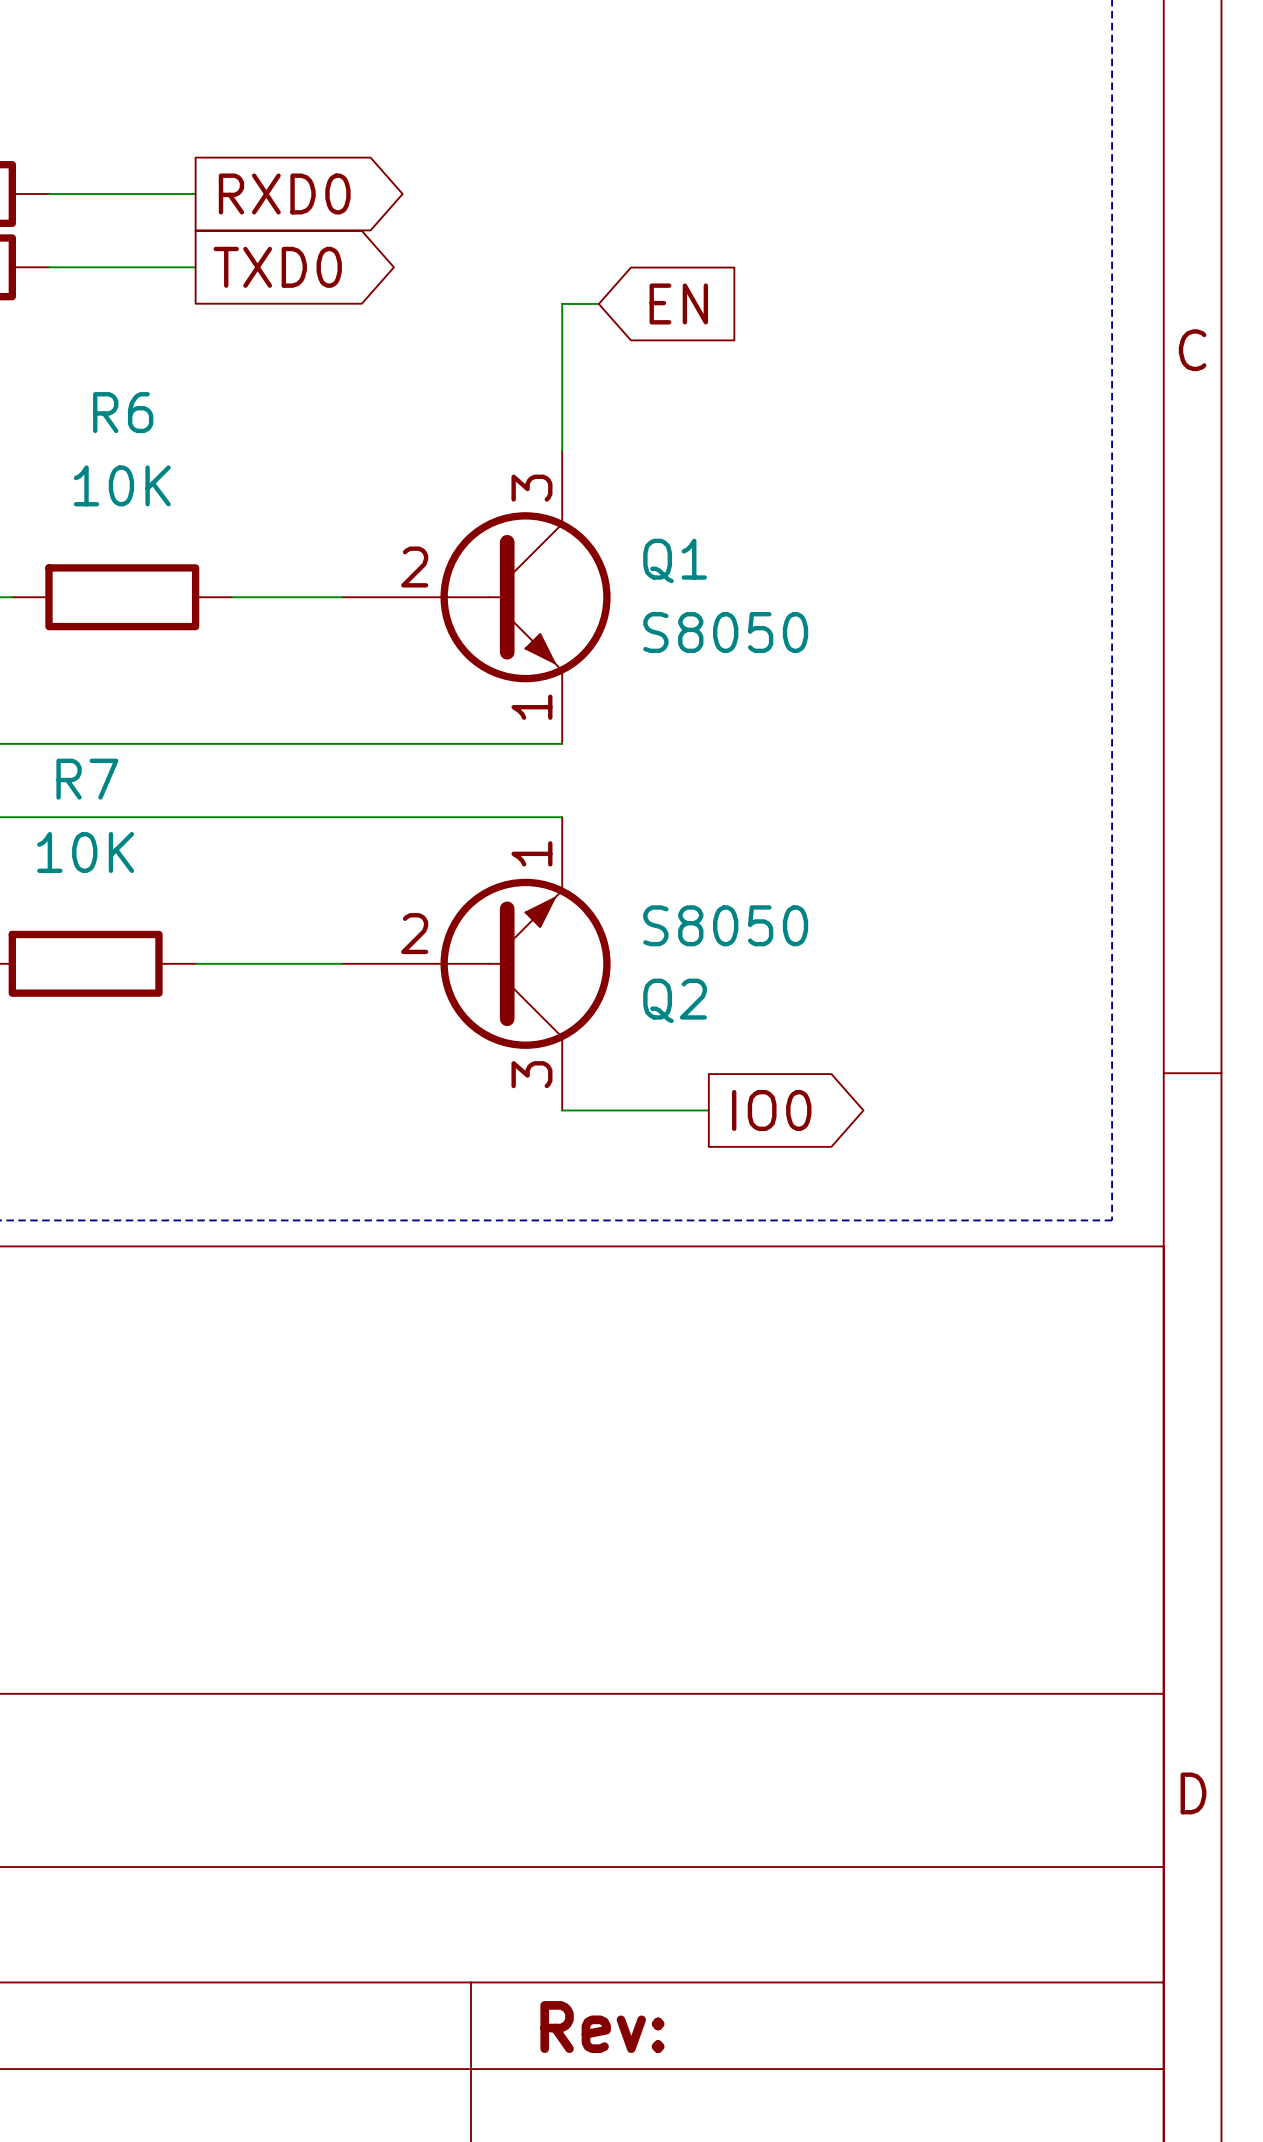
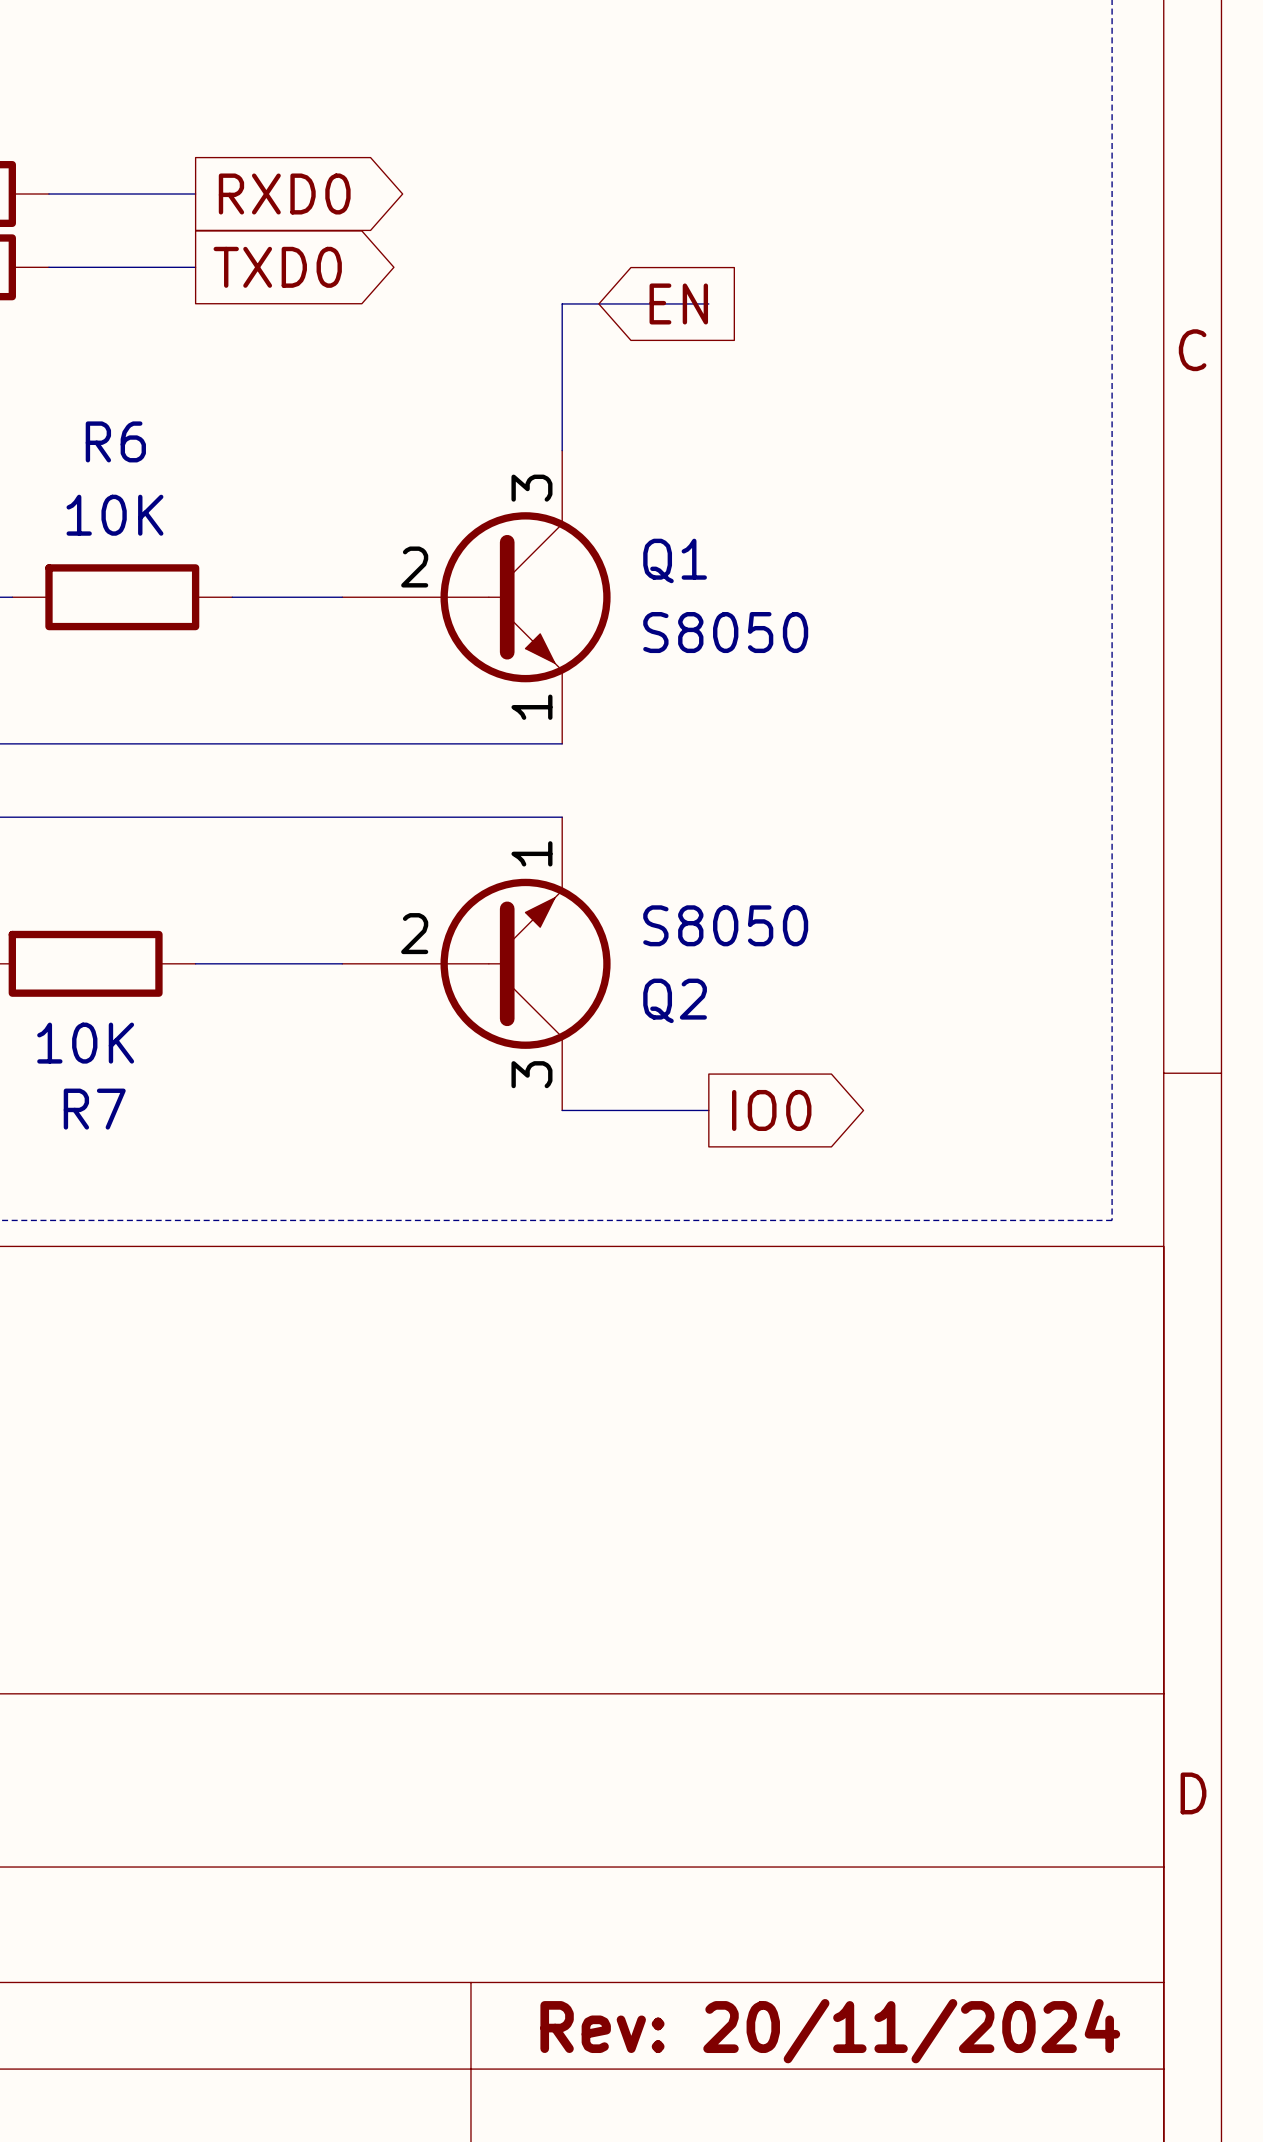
wire: none -> (598, 303) (708, 303)
R6 name position: R6 (123, 412) -> R6 (115, 441)
R6 value position: 10K (122, 485) -> 10K (114, 515)
R7 name position: R7 (87, 779) -> R7 (94, 1109)
R7 value position: 10K (85, 852) -> 10K (85, 1043)
title block: Rev: (602, 2027) -> Rev: 20/11/2024 (830, 2031)

